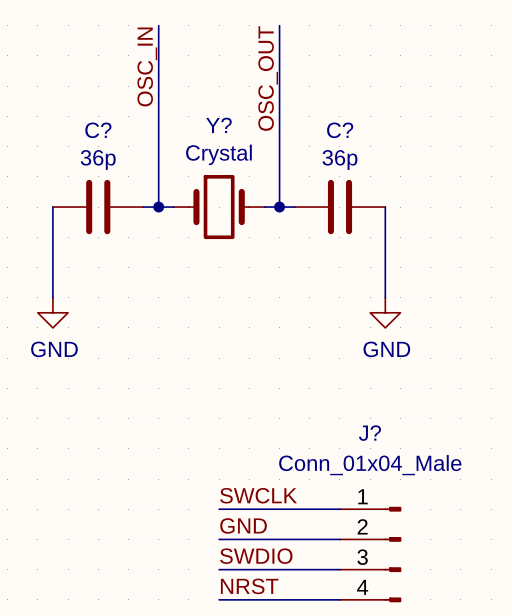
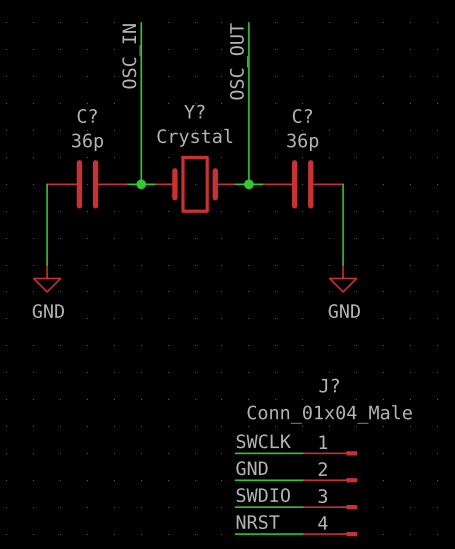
label position: SWCLK (258, 495) -> SWCLK (263, 441)
wire: (219, 509) (264, 509) -> none
label position: GND (243, 525) -> GND (251, 468)
wire: (219, 539) (264, 539) -> none
label position: SWDIO (256, 556) -> SWDIO (263, 495)
wire: (219, 569) (264, 569) -> none
label position: NRST (249, 586) -> NRST (258, 522)
wire: (219, 599) (264, 599) -> none

